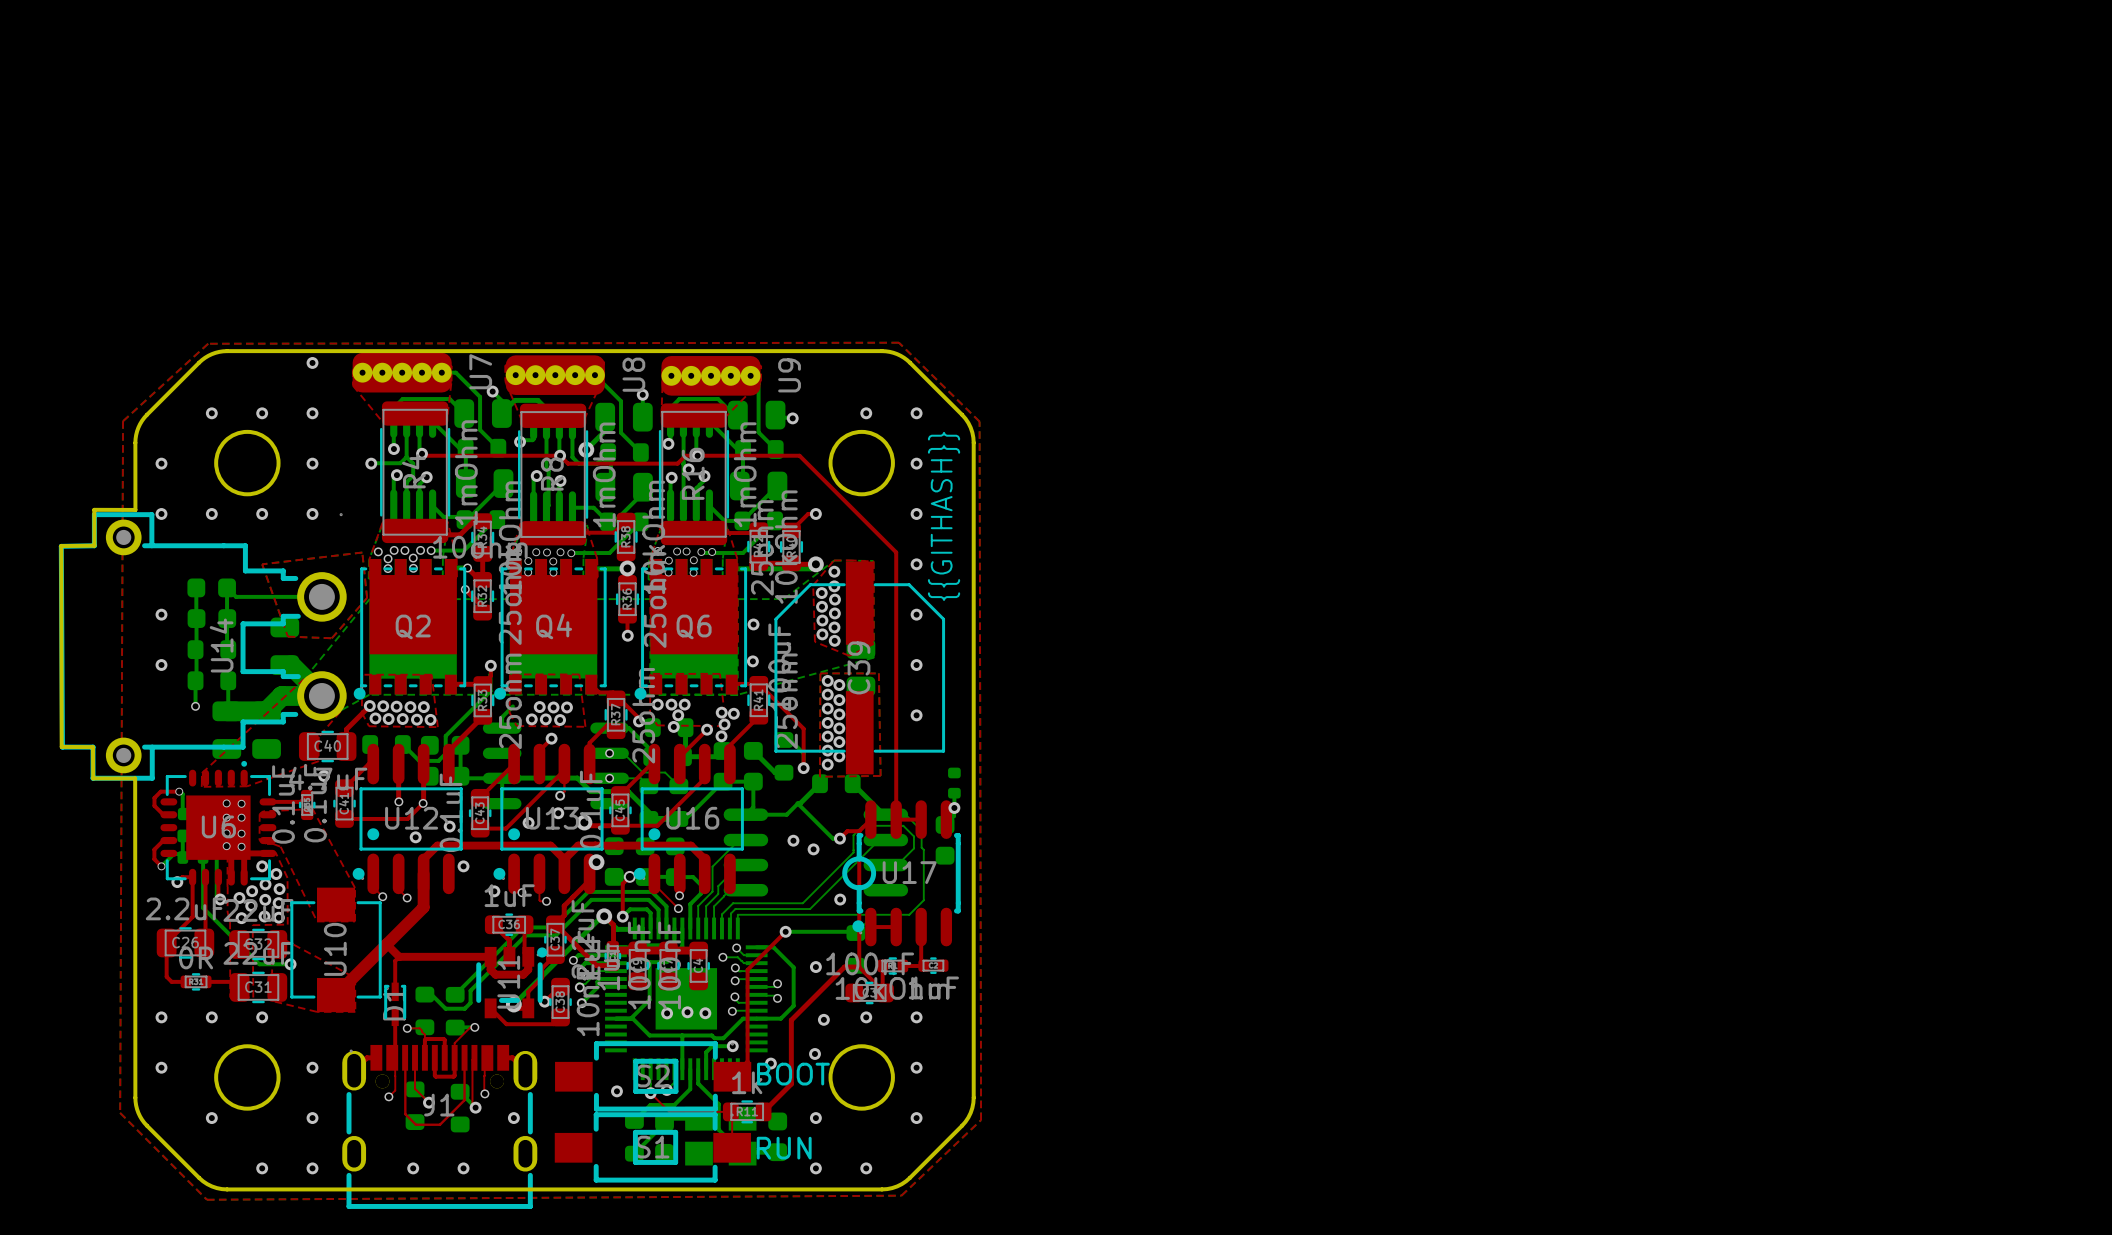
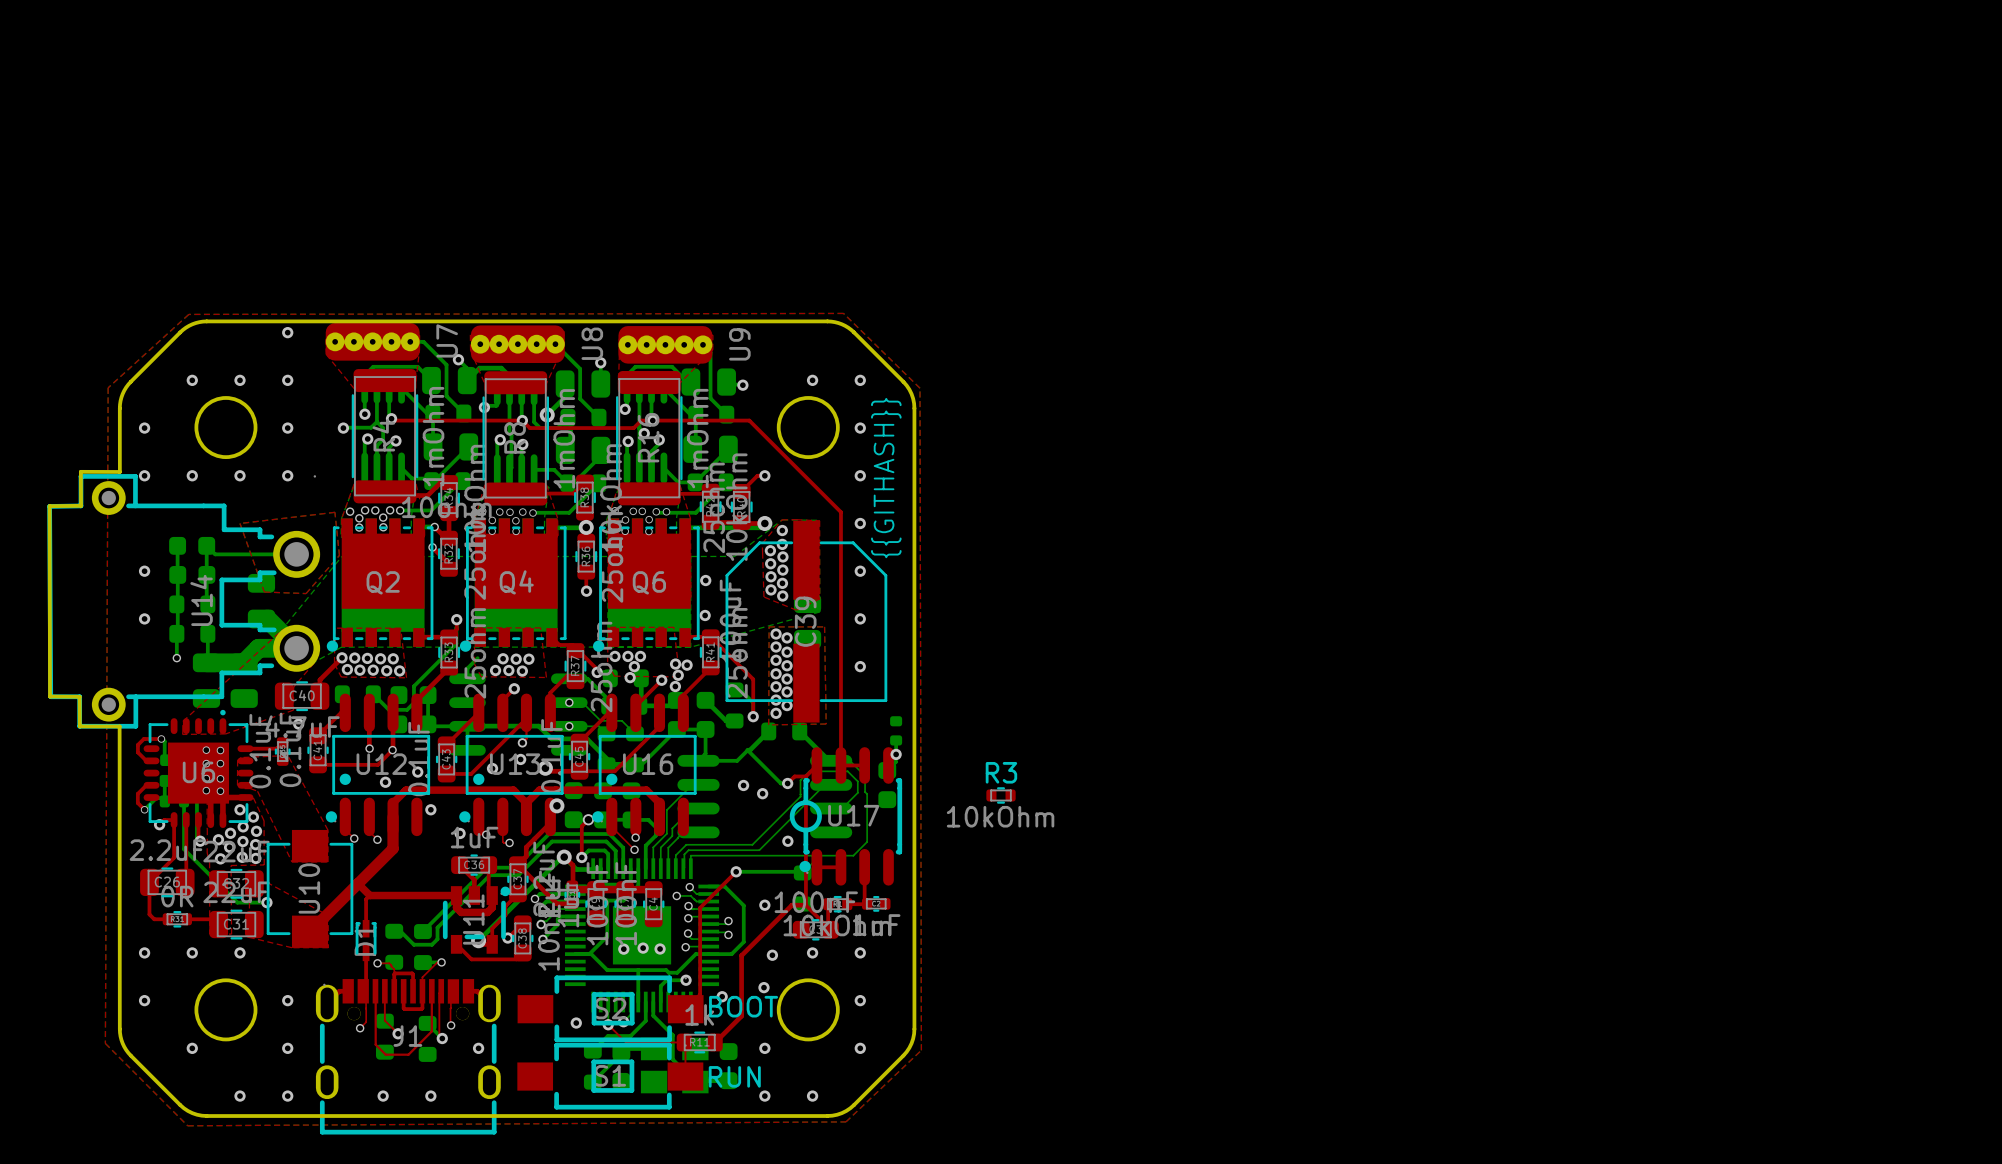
R3: none -> 10kOhm (1001, 795)

